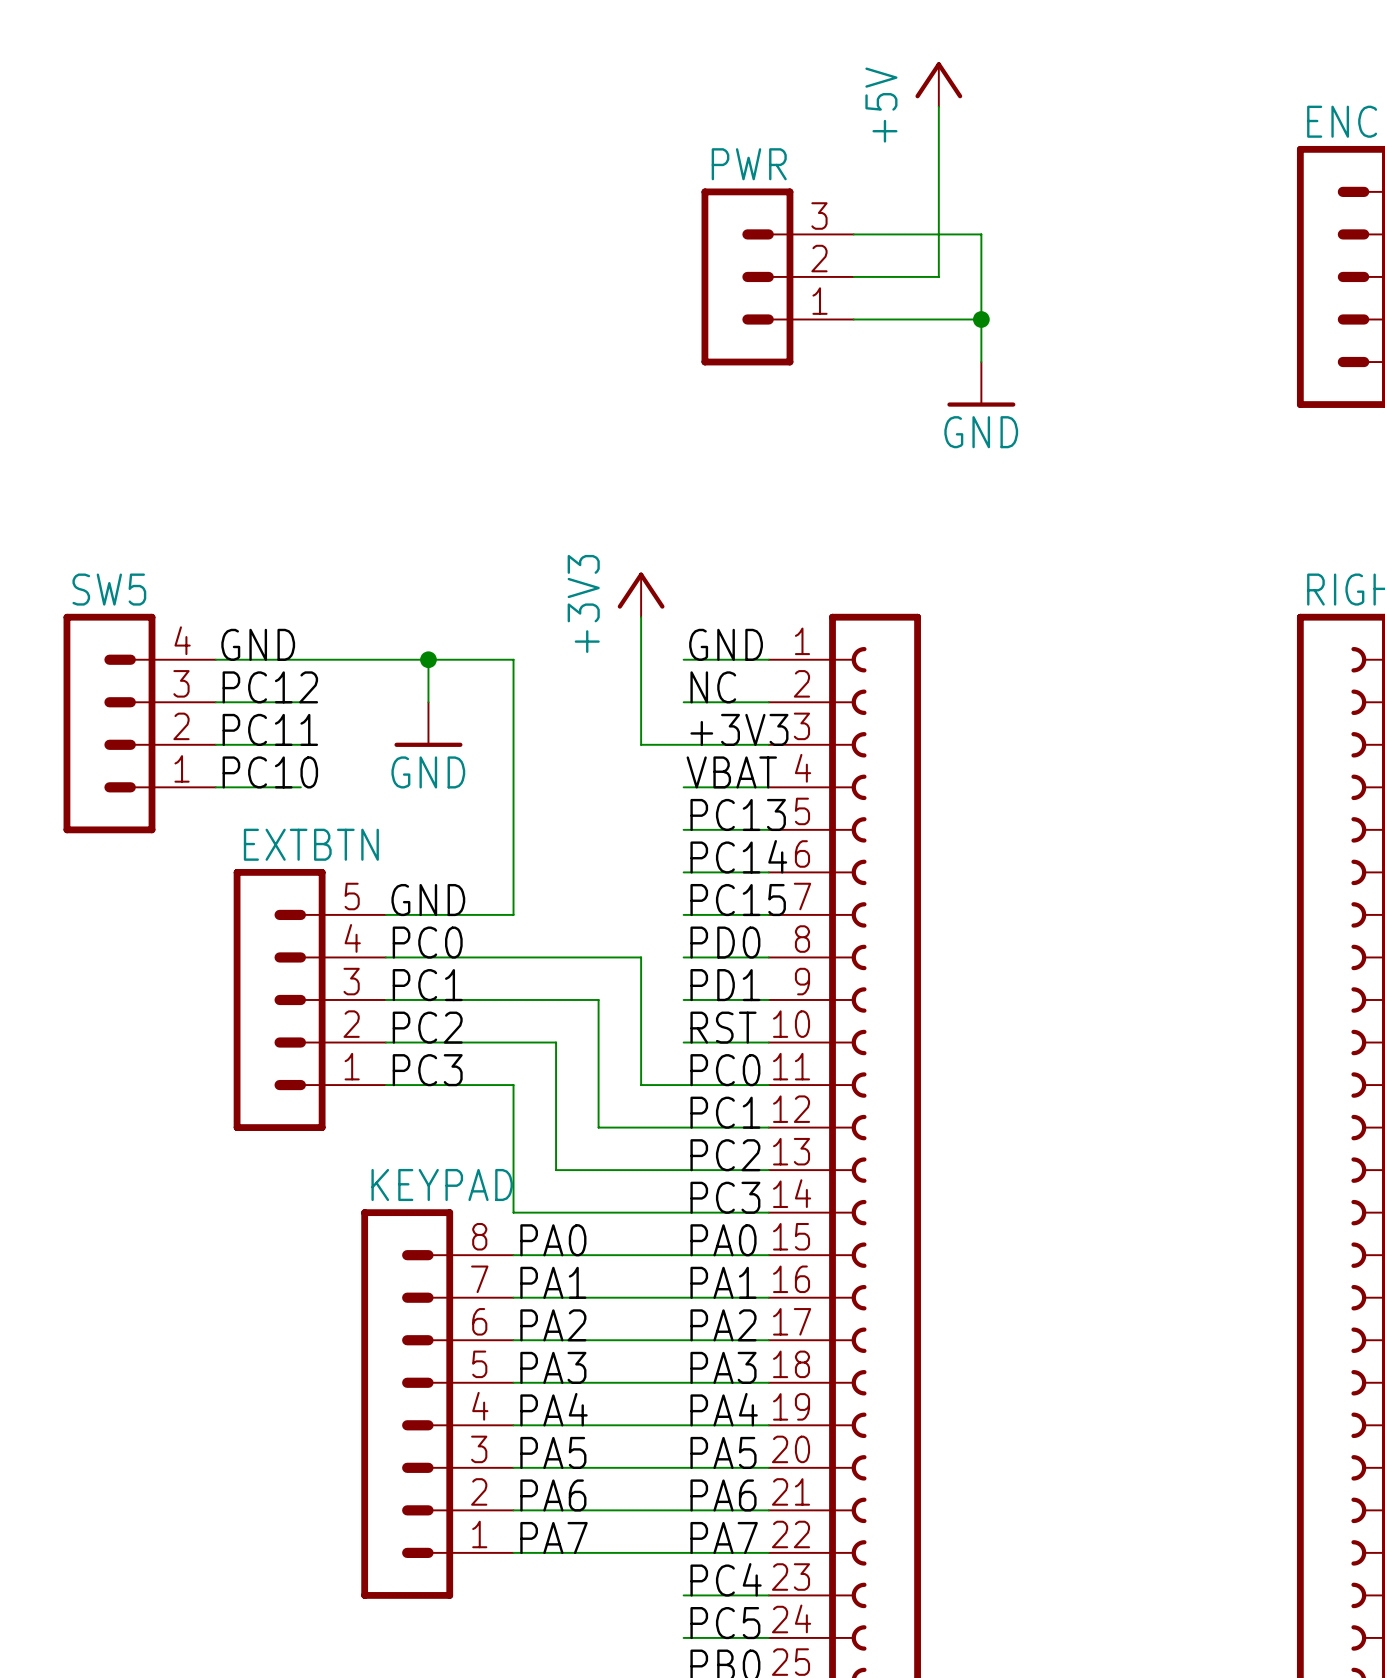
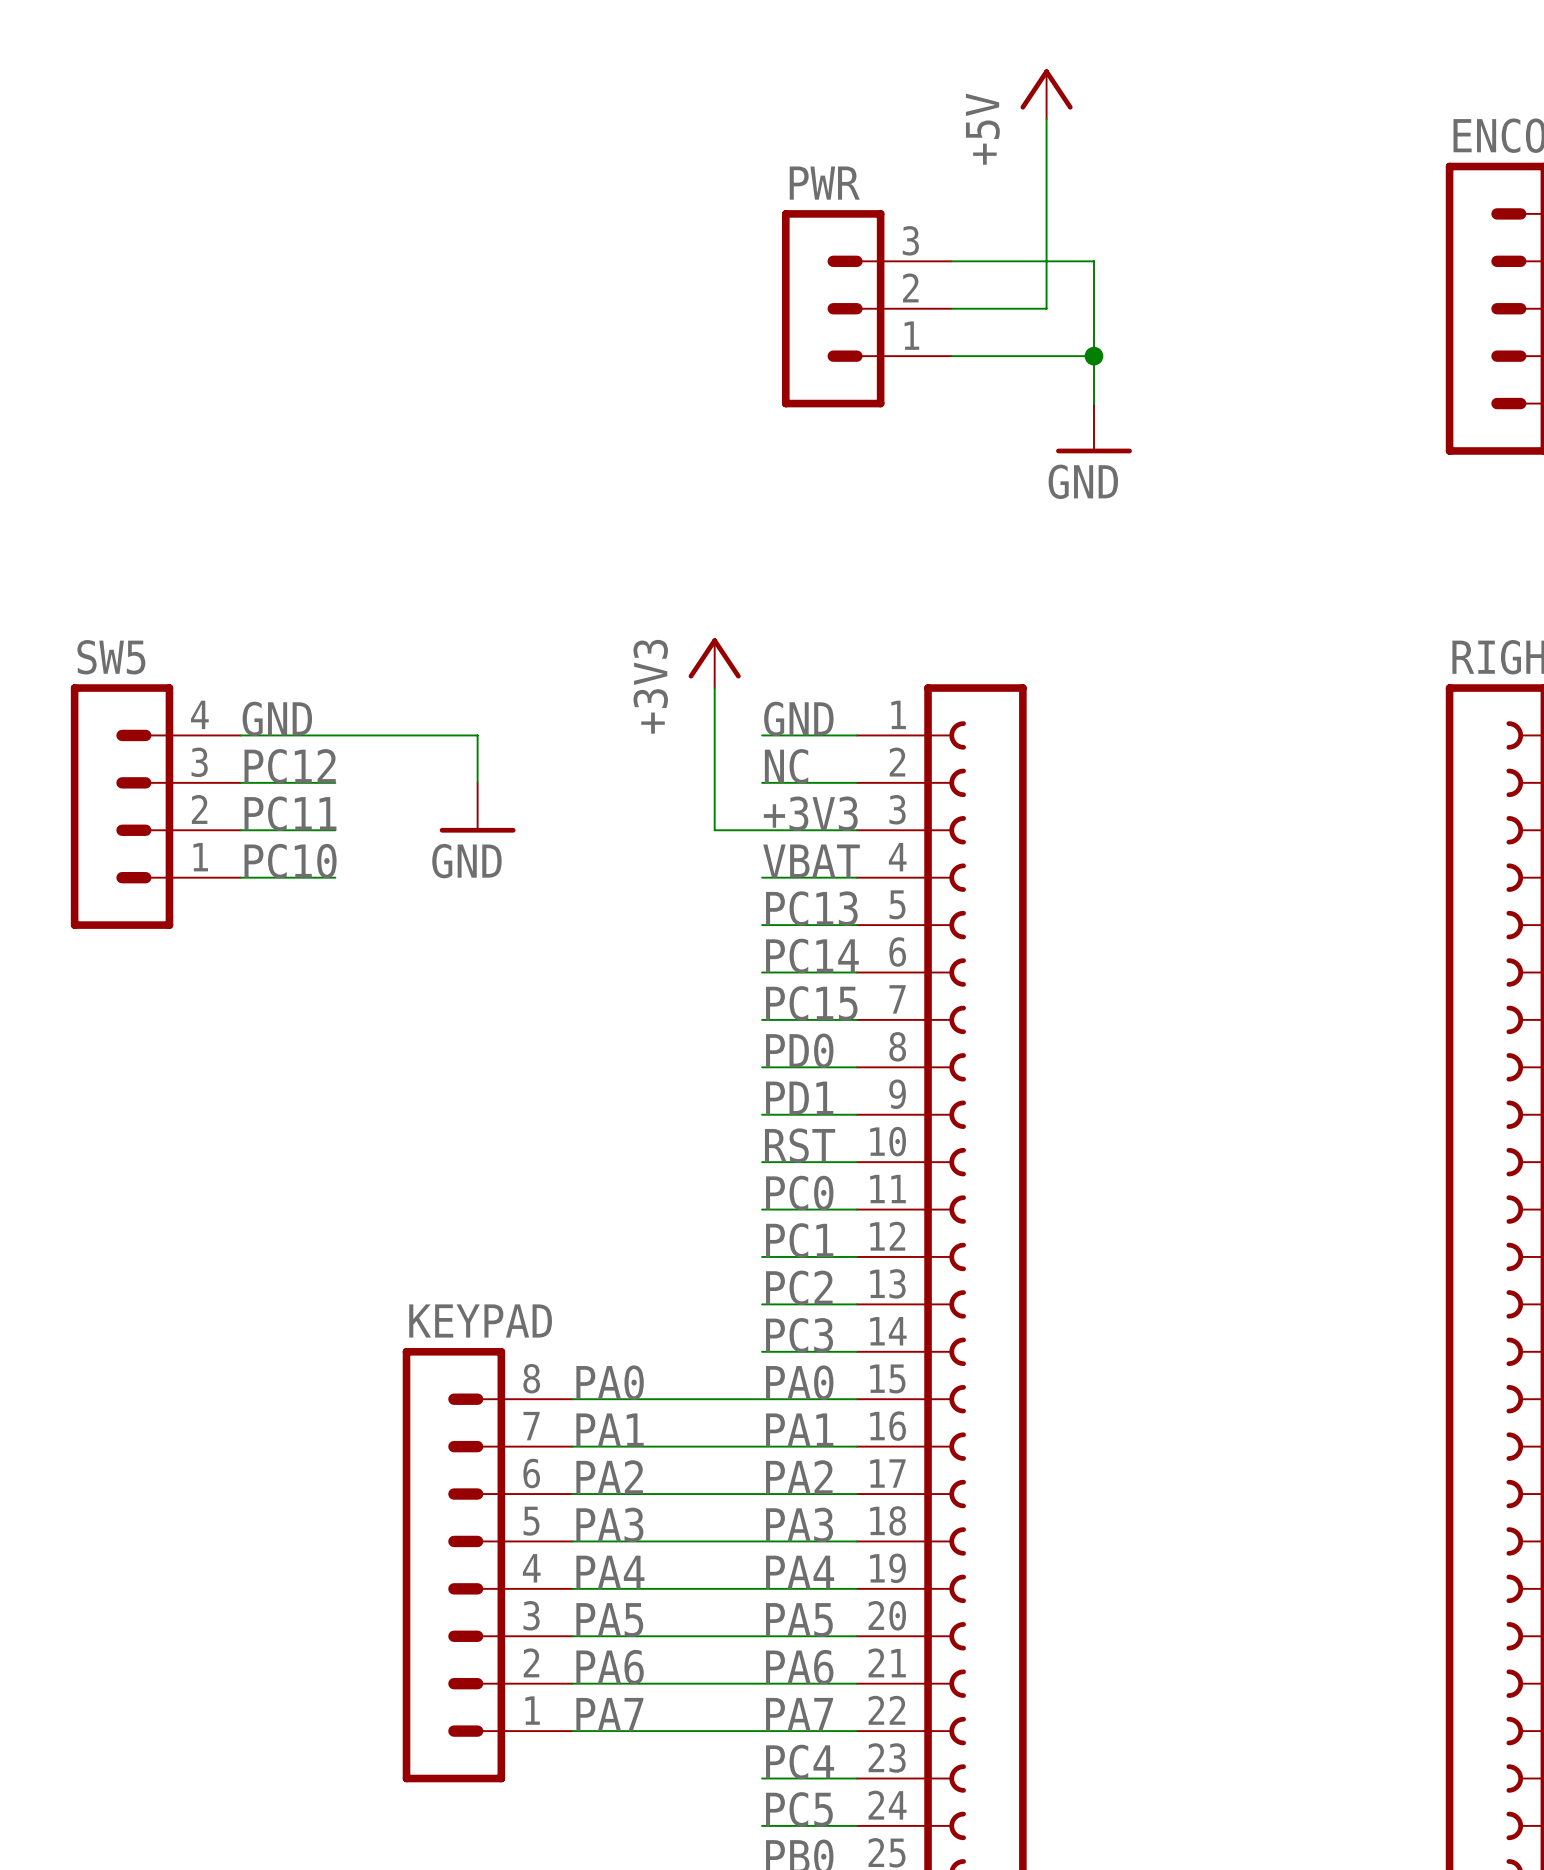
wire: (428, 659) (513, 659) (513, 914) (385, 914) -> none
junction: (428, 659) -> none
label: GND (428, 900) -> none
label: PC0 (427, 942) -> none
wire: (385, 957) (641, 957) (641, 1085) (683, 1085) -> none
label: PC1 (427, 985) -> none
EXTBTN: (309, 999) -> none
wire: (385, 999) (598, 999) (598, 1127) (683, 1127) -> none
label: PC2 (427, 1027) -> none
wire: (385, 1042) (556, 1042) (556, 1170) (683, 1170) -> none
label: PC3 (427, 1070) -> none
wire: (385, 1085) (513, 1085) (513, 1212) (683, 1212) -> none

